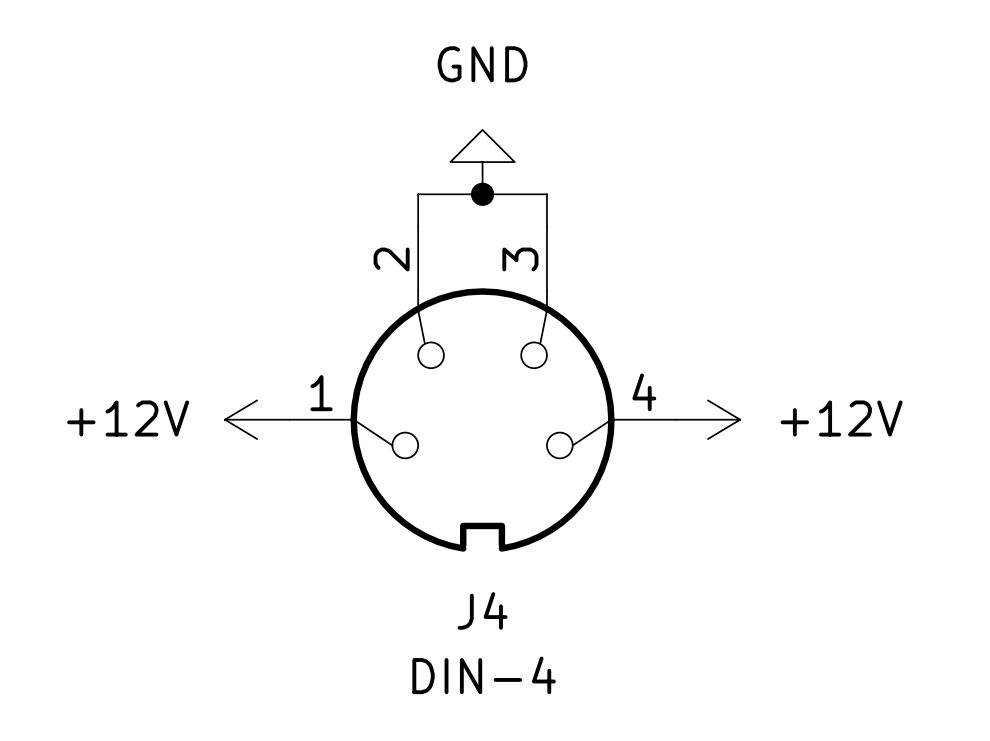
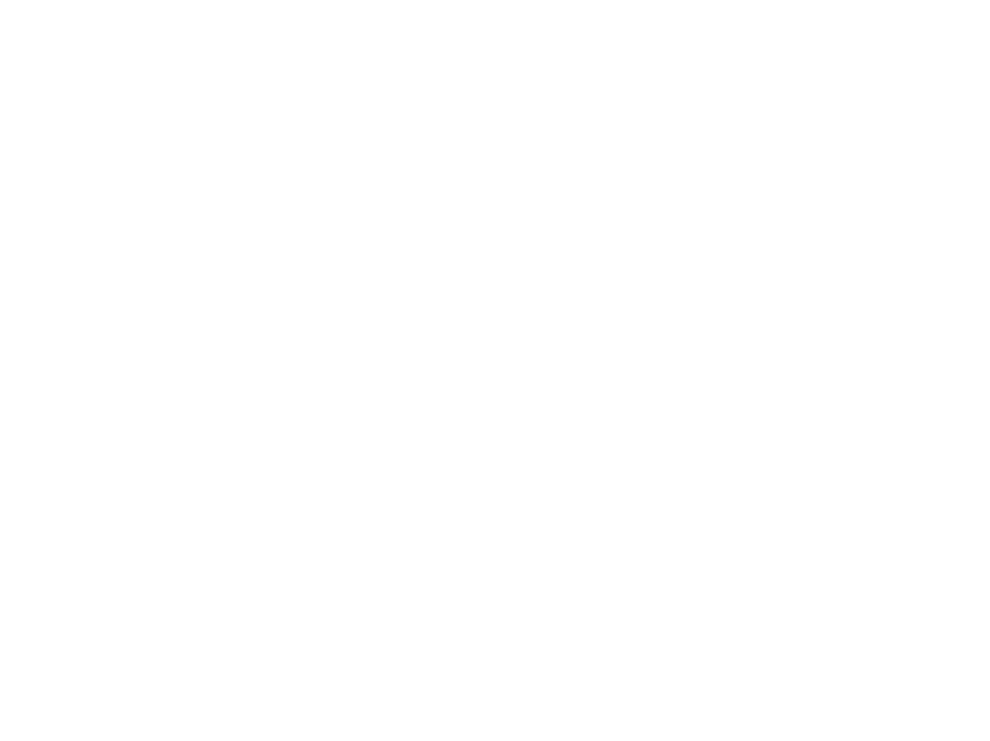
power symbol: GND (482, 162) -> none
junction: (482, 194) -> none
wire: (418, 226) (418, 194) (546, 194) (546, 226) -> none
J4: DIN-4 (482, 389) -> none
power symbol: +12V (257, 419) -> none
power symbol: +12V (707, 419) -> none

